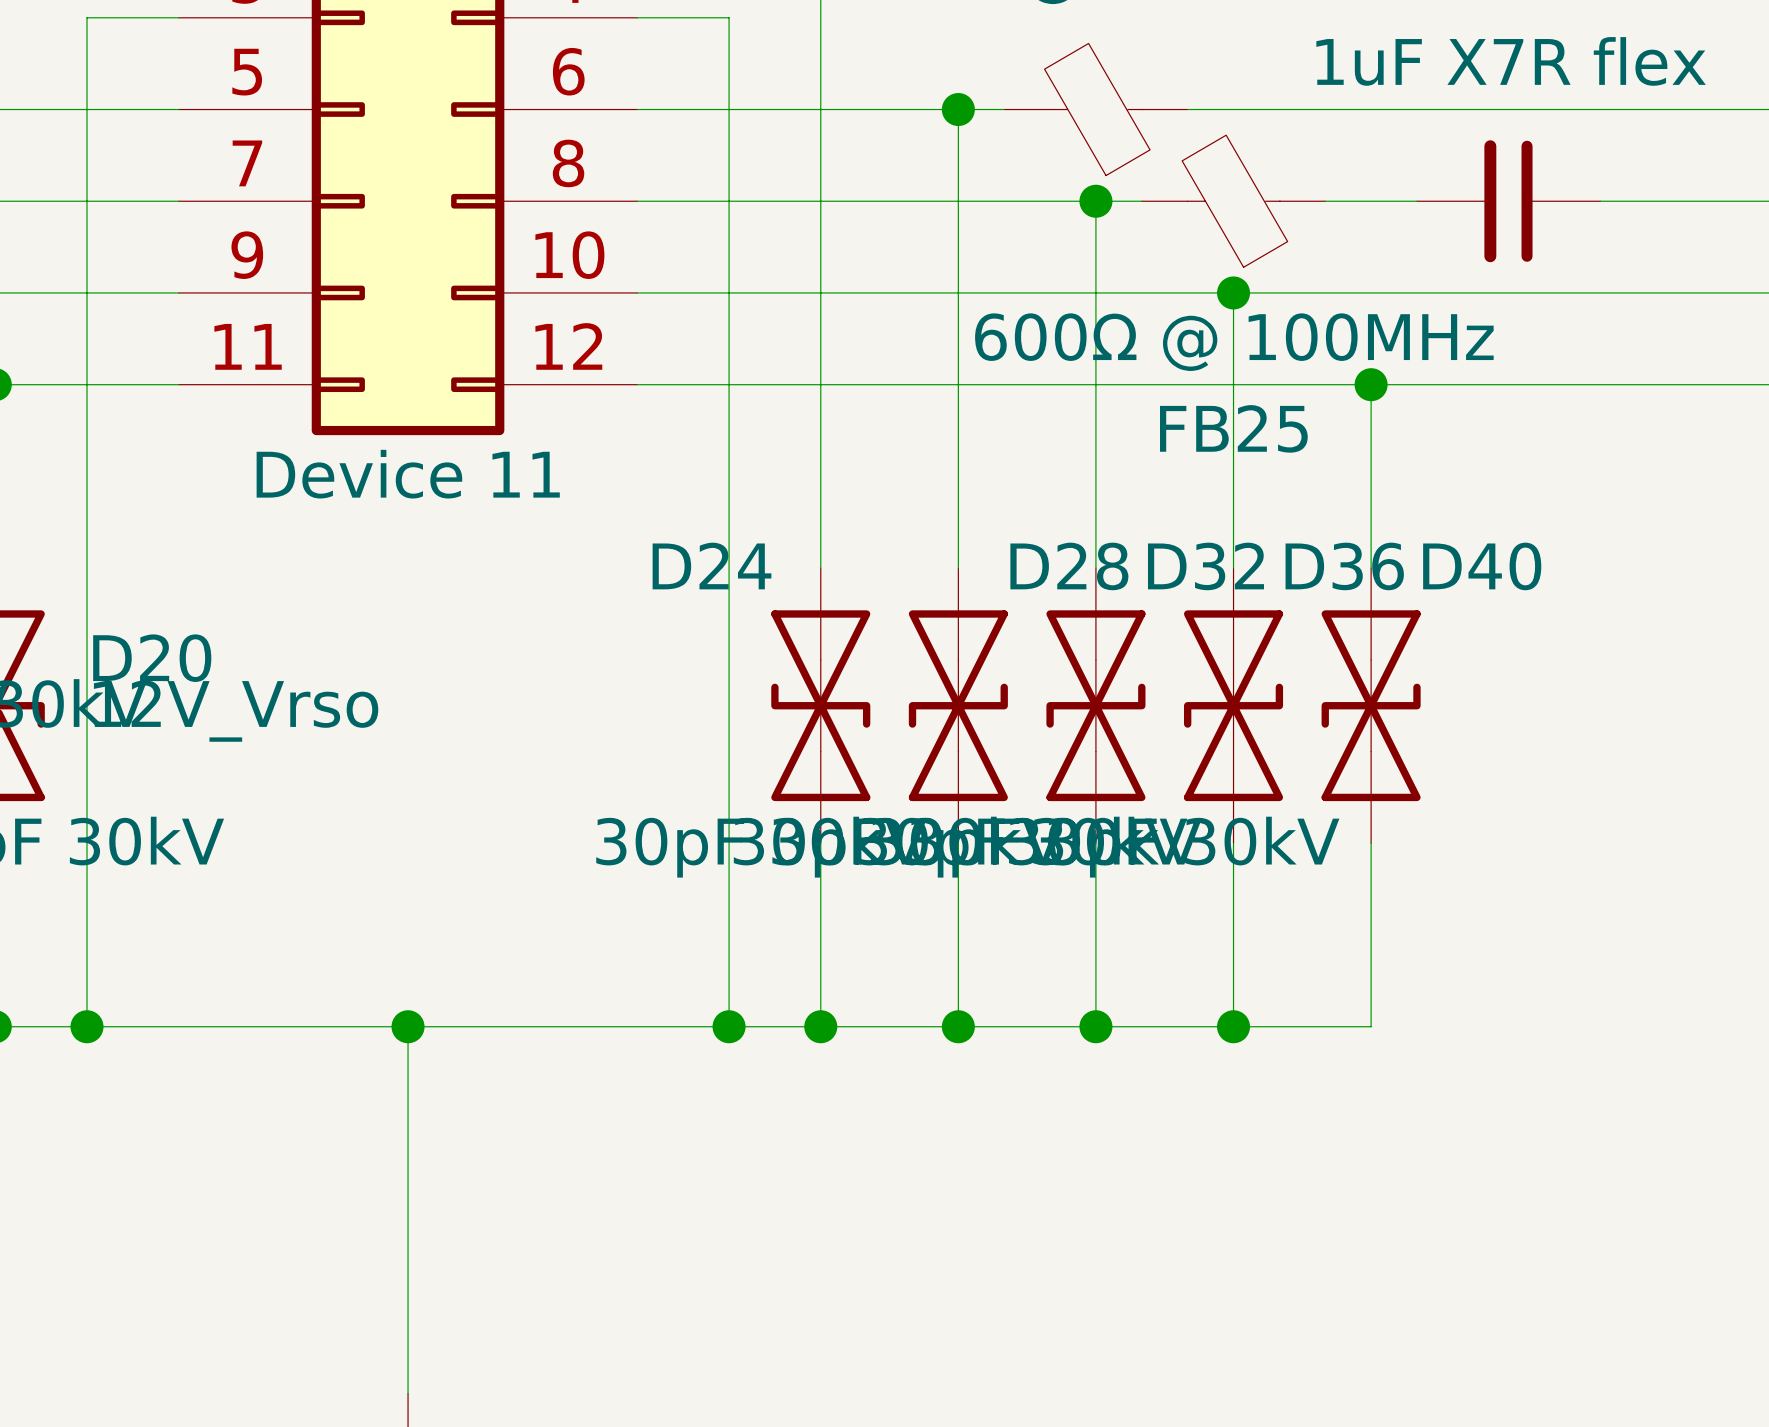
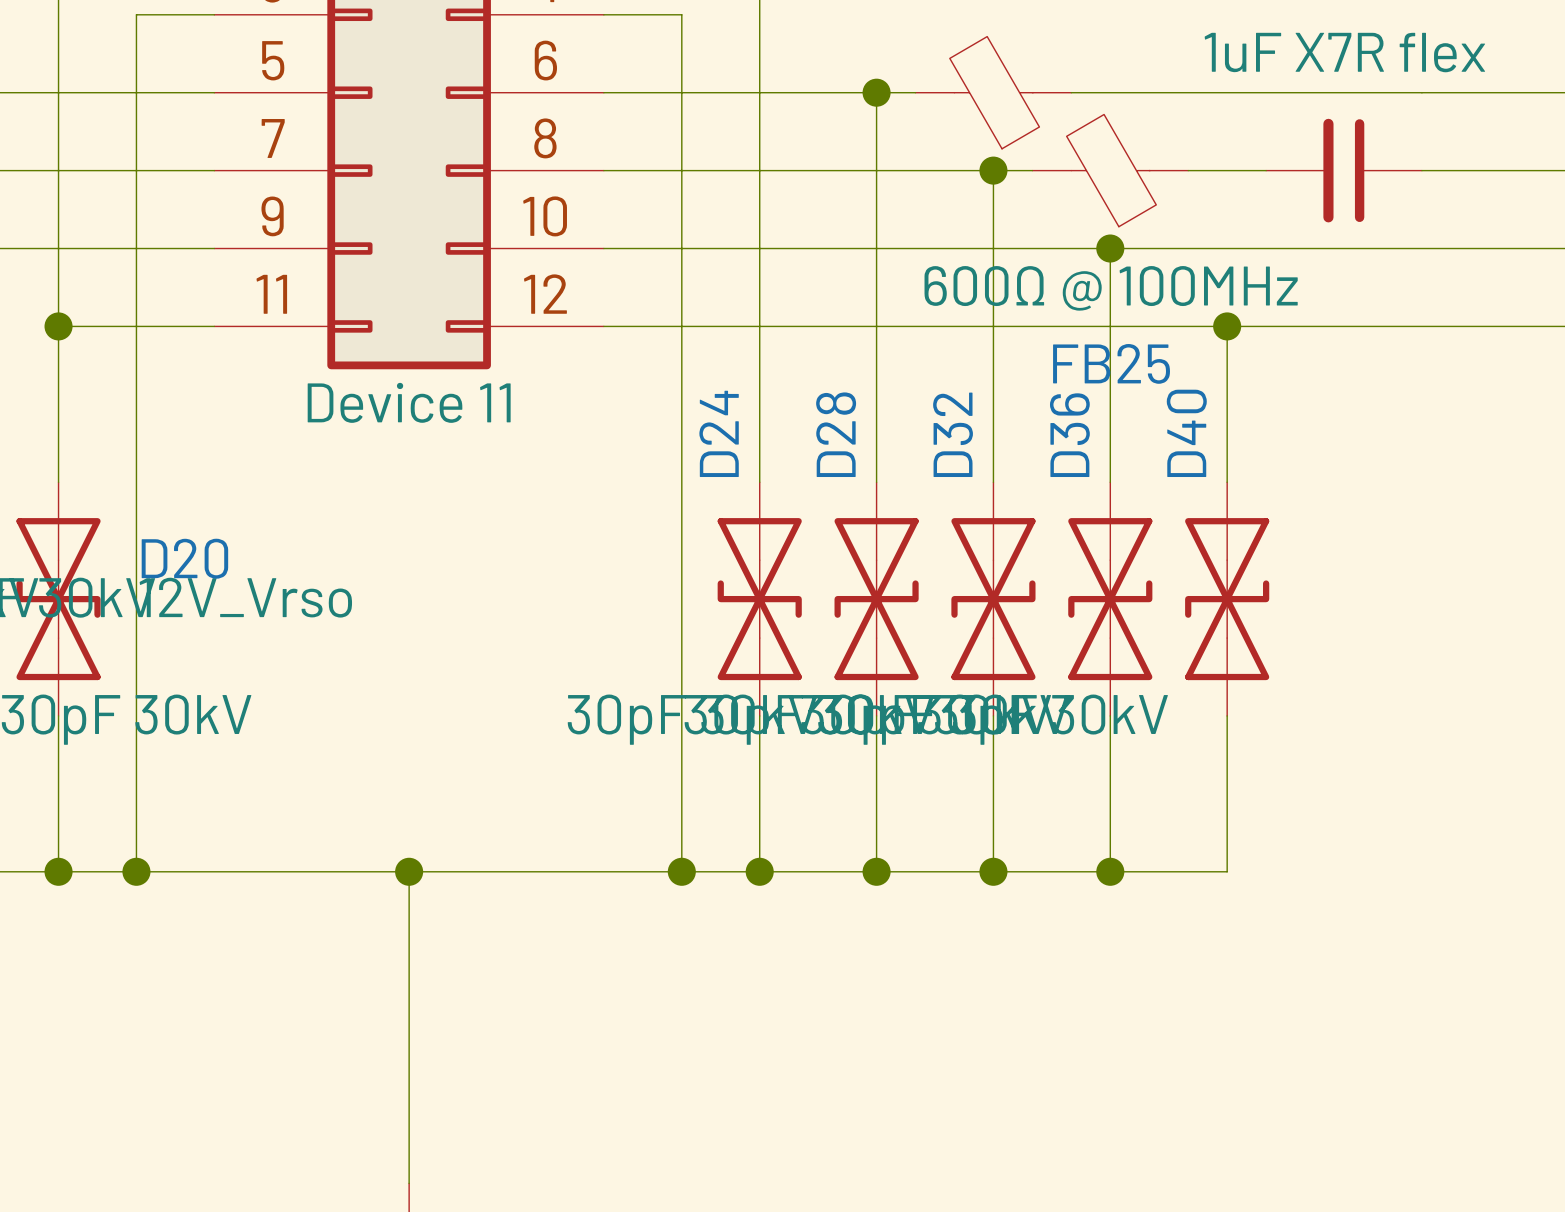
D24 name rotation: 0° (712, 566) -> 90° counterclockwise (719, 433)
D28 name rotation: 0° (1069, 566) -> 90° counterclockwise (836, 434)
D28 name position: D28 (1069, 566) -> D28 (836, 434)
D32 name rotation: 0° (1205, 566) -> 90° counterclockwise (953, 434)
D32 name position: D32 (1205, 566) -> D32 (953, 434)
D36 name rotation: 0° (1344, 566) -> 90° counterclockwise (1069, 435)
D36 name position: D36 (1344, 566) -> D36 (1069, 435)
D40 name rotation: 0° (1482, 566) -> 90° counterclockwise (1186, 433)
D40 name position: D40 (1482, 566) -> D40 (1186, 433)

